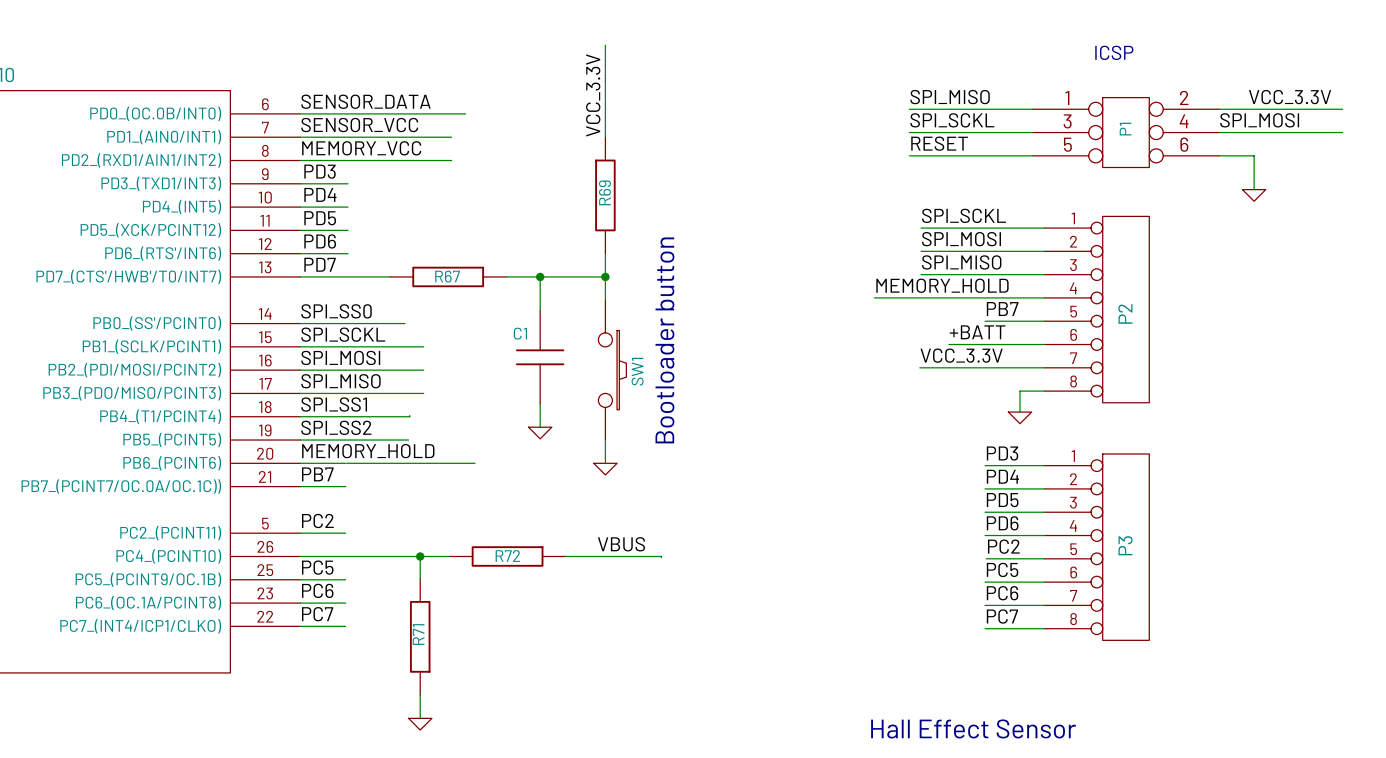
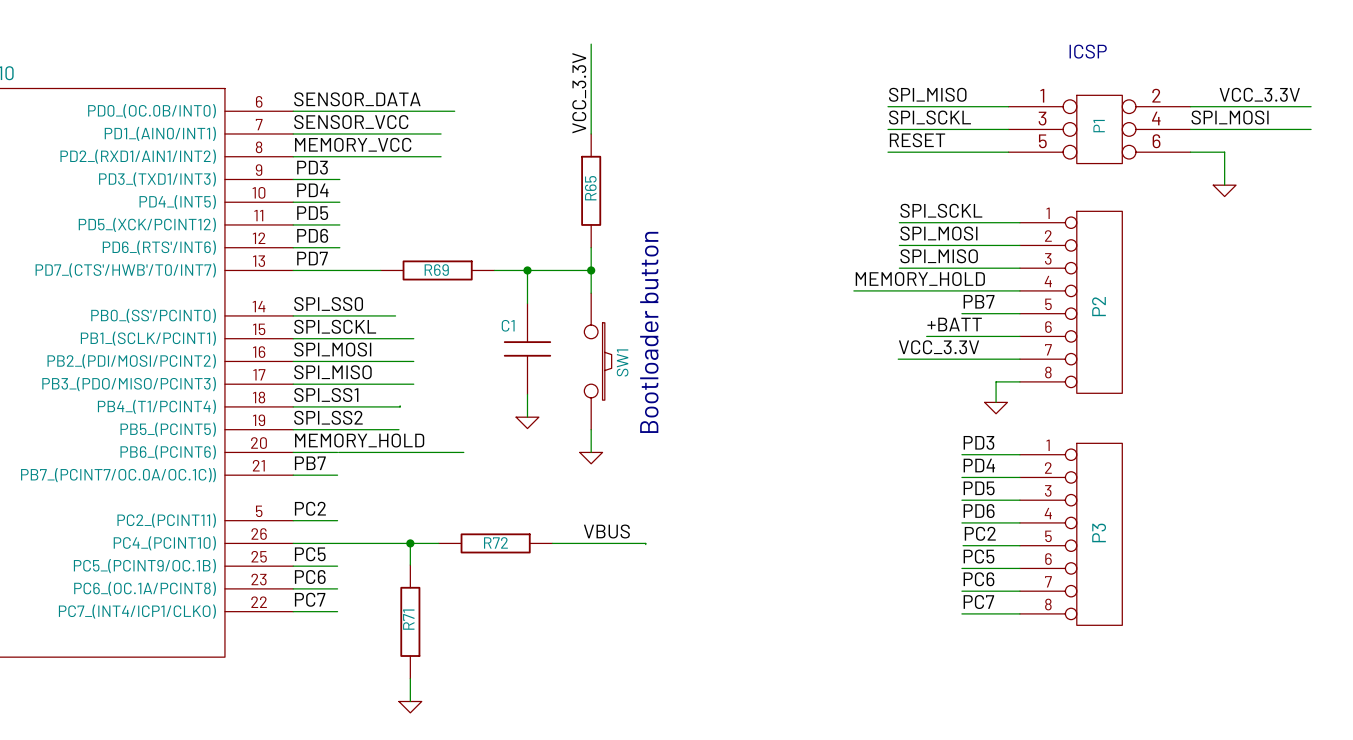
R69 name: R69 (604, 192) -> R65 (590, 188)
R67 name: R67 (447, 276) -> R69 (436, 270)
text: Hall Effect Sensor (973, 728) -> none

